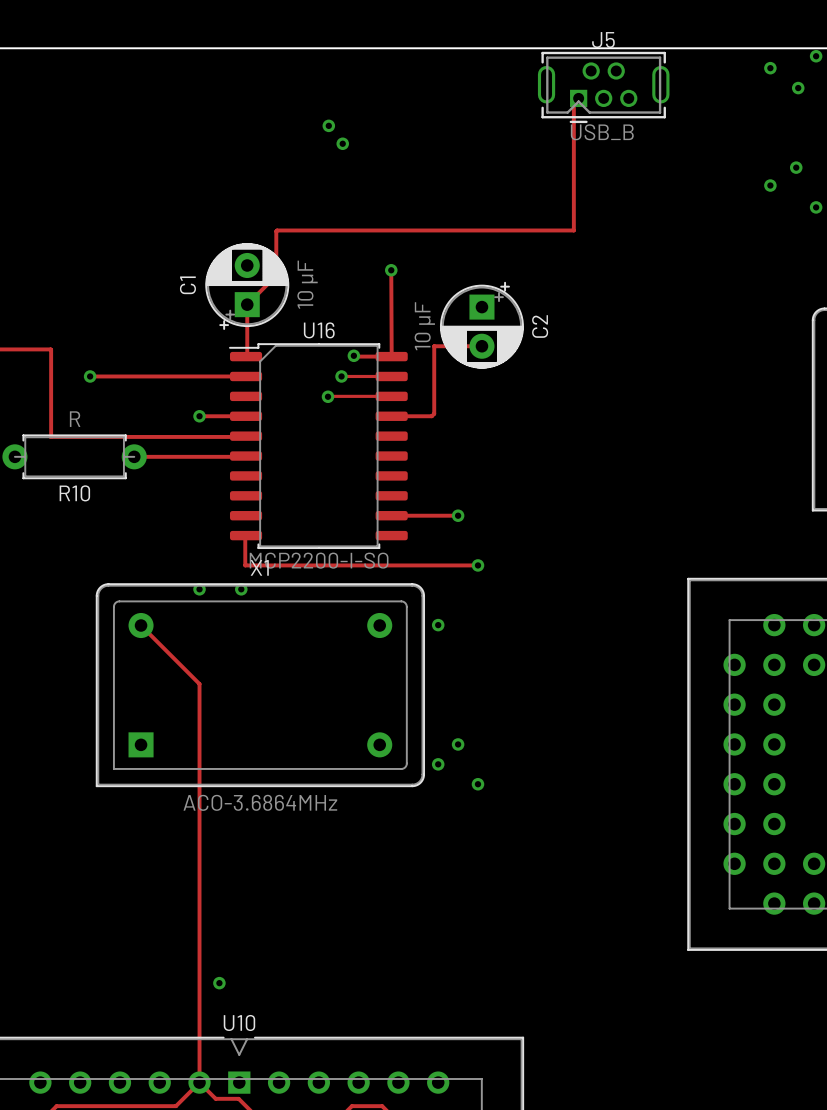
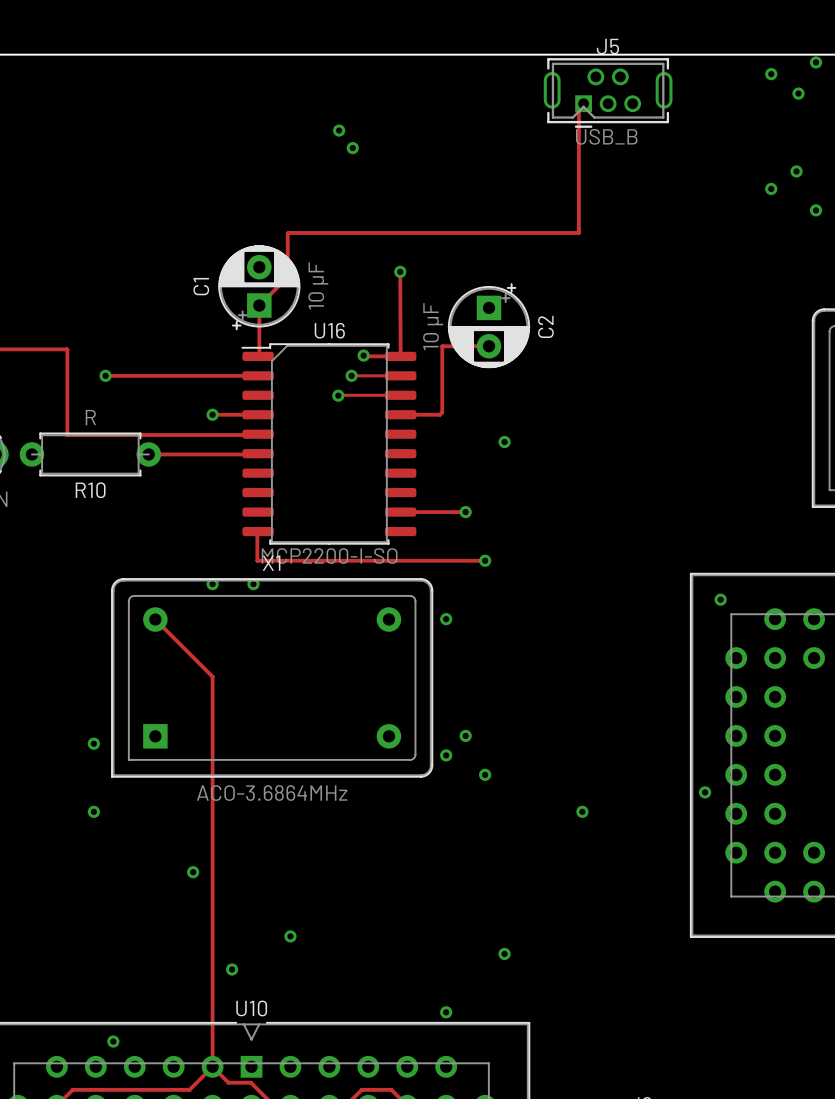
via: none -> (504, 442)
via: none -> (720, 599)
via: none -> (93, 743)
via: none -> (705, 792)
via: none -> (93, 811)
via: none -> (582, 811)
via: none -> (193, 872)
via: none -> (290, 936)
via: none -> (504, 953)
via: none -> (446, 1012)
via: none -> (113, 1041)

